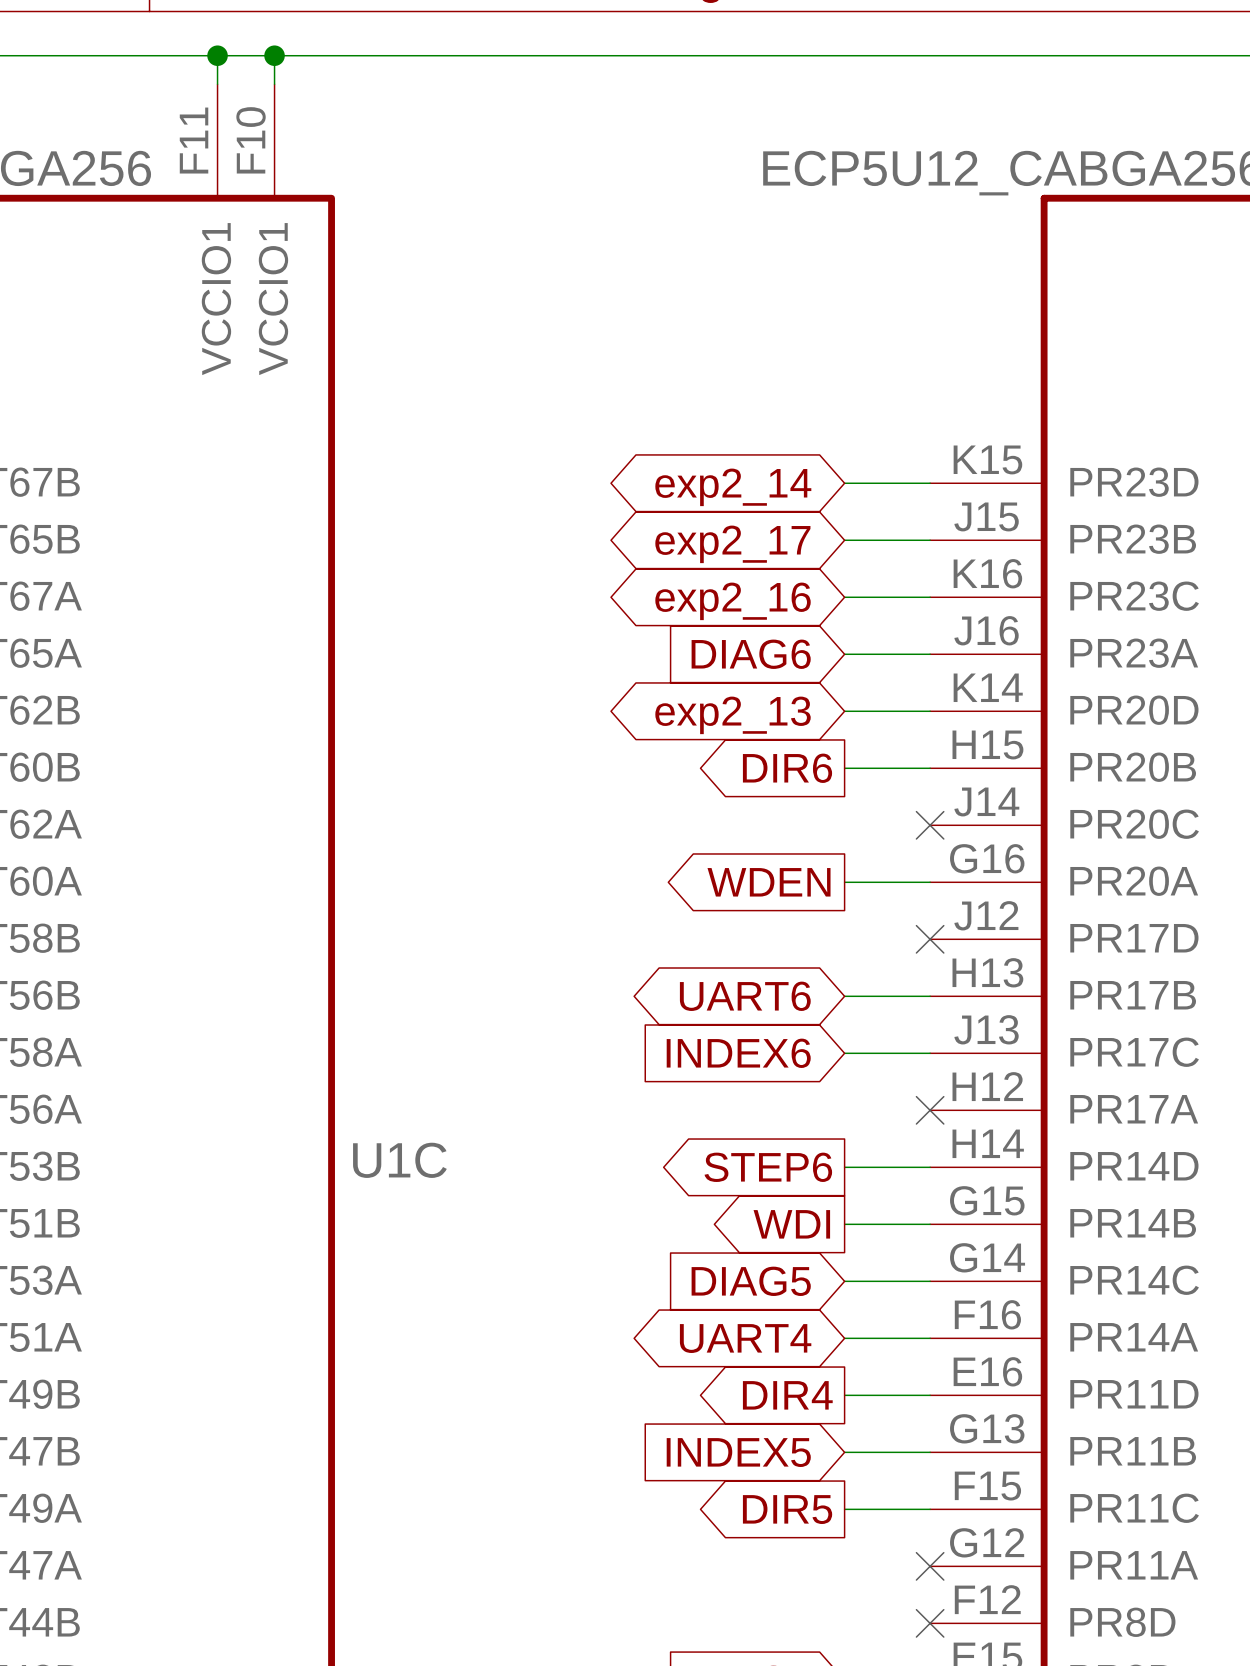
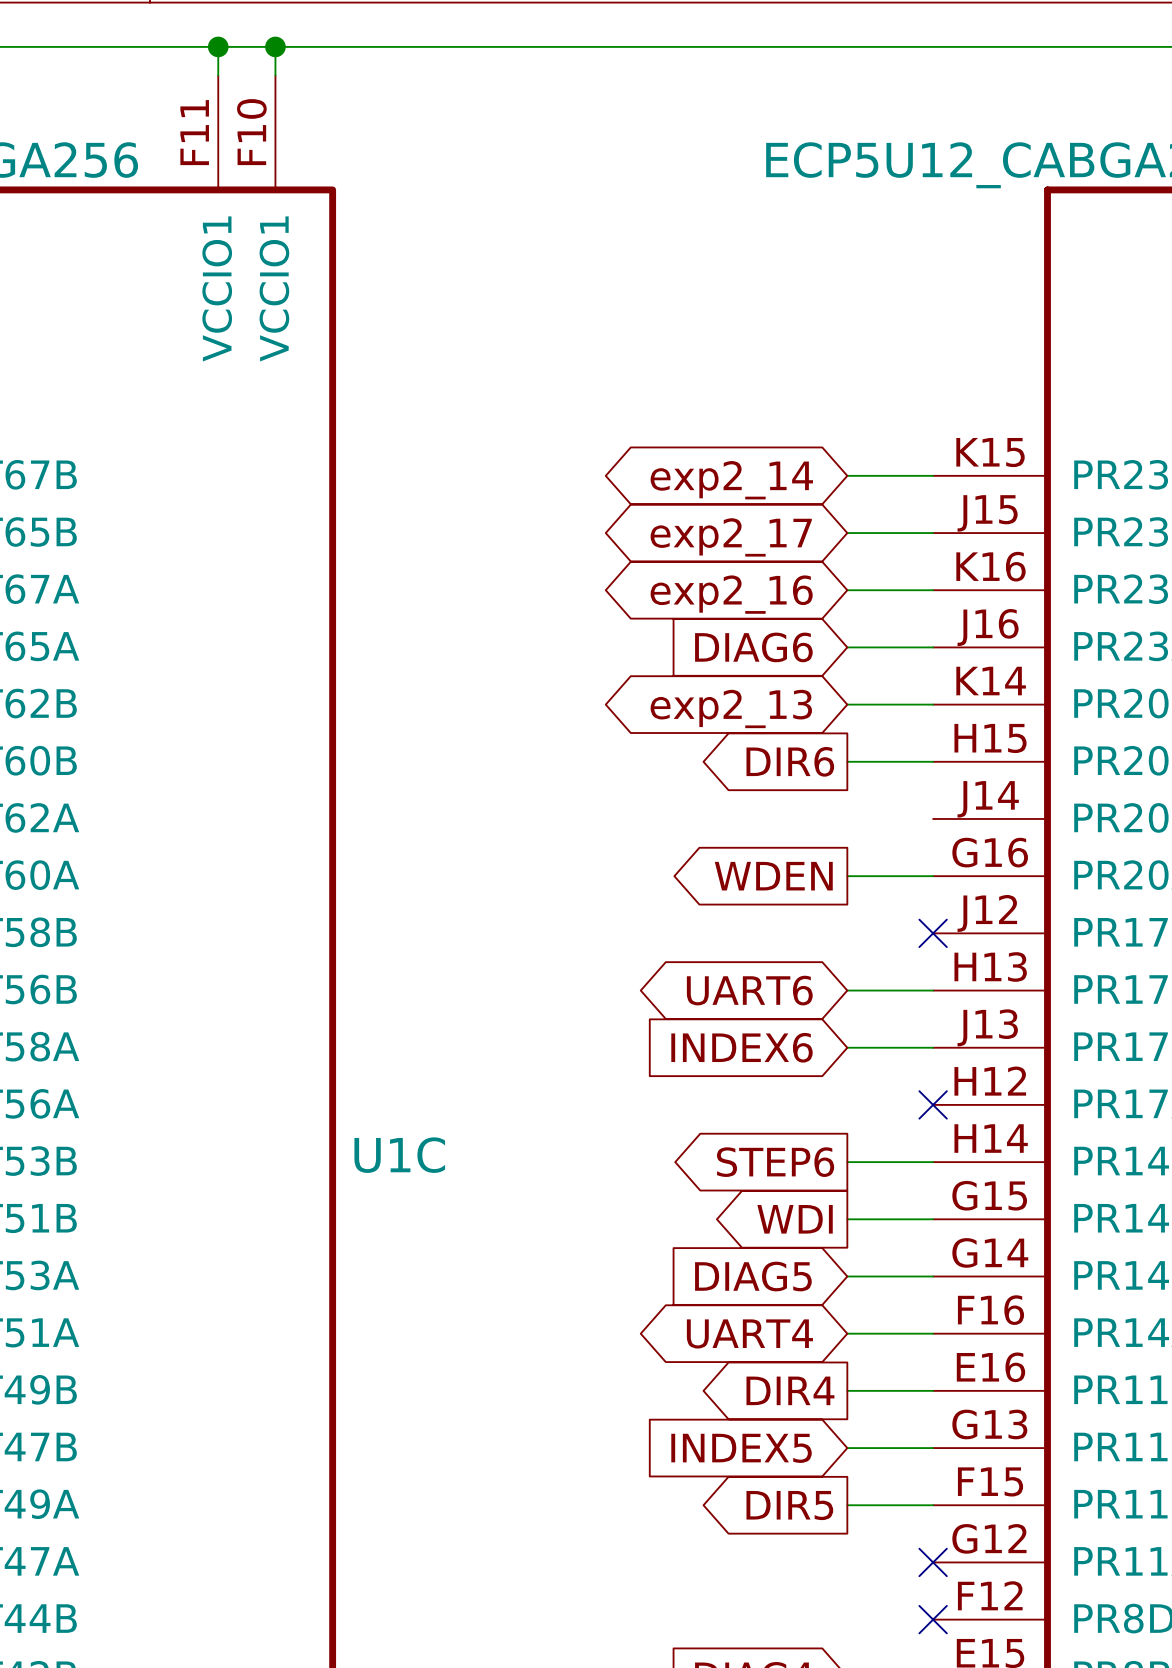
no-connect mark: (930, 825) -> none

